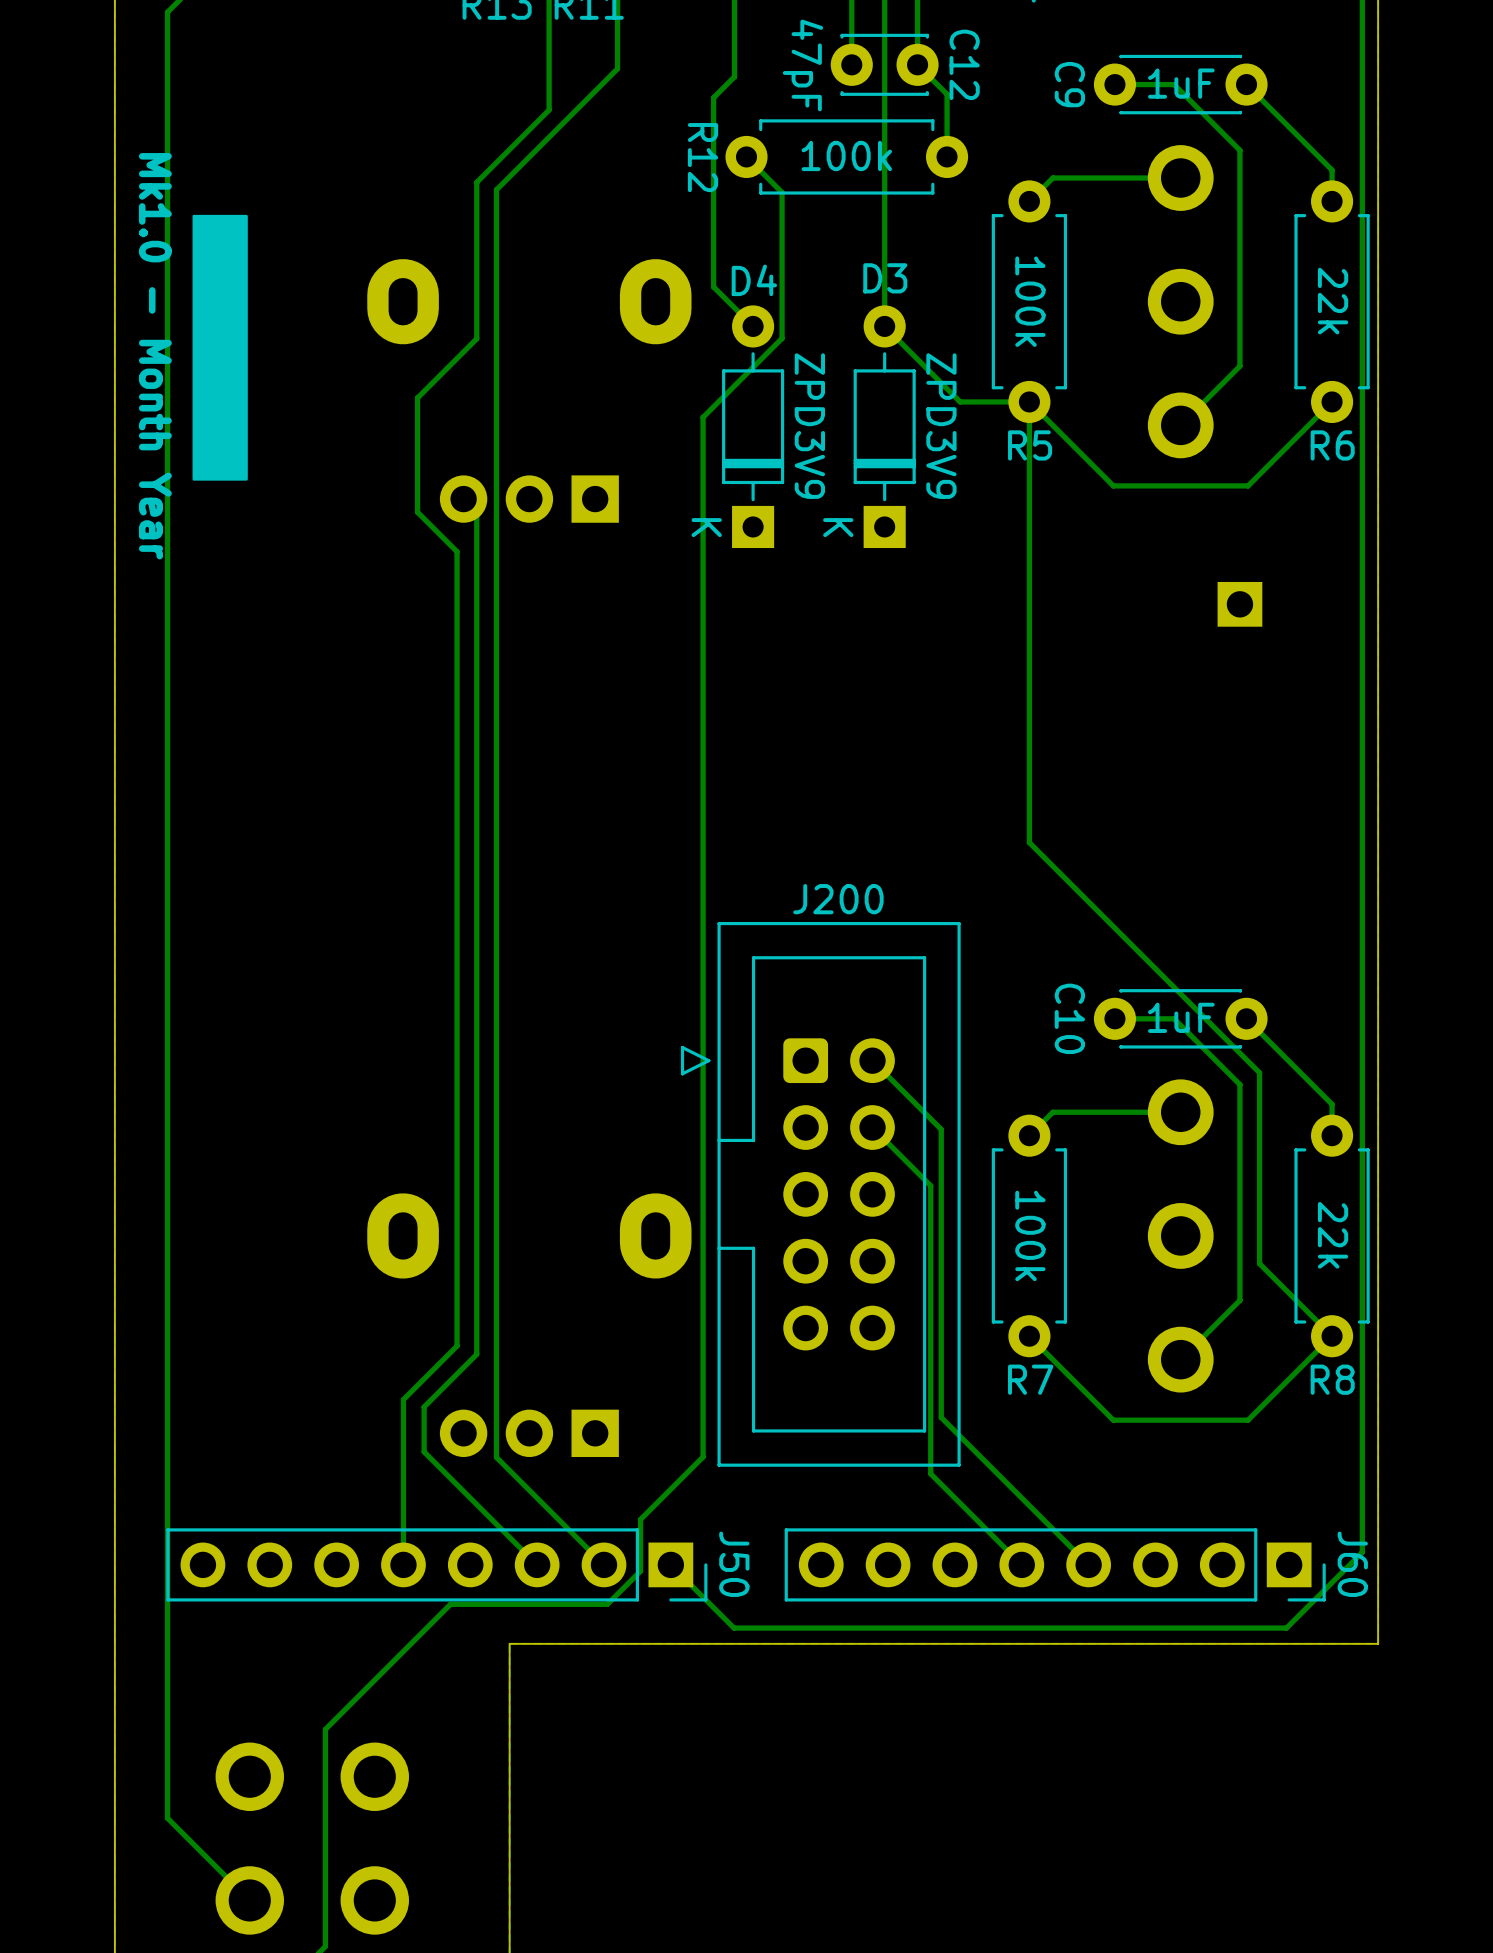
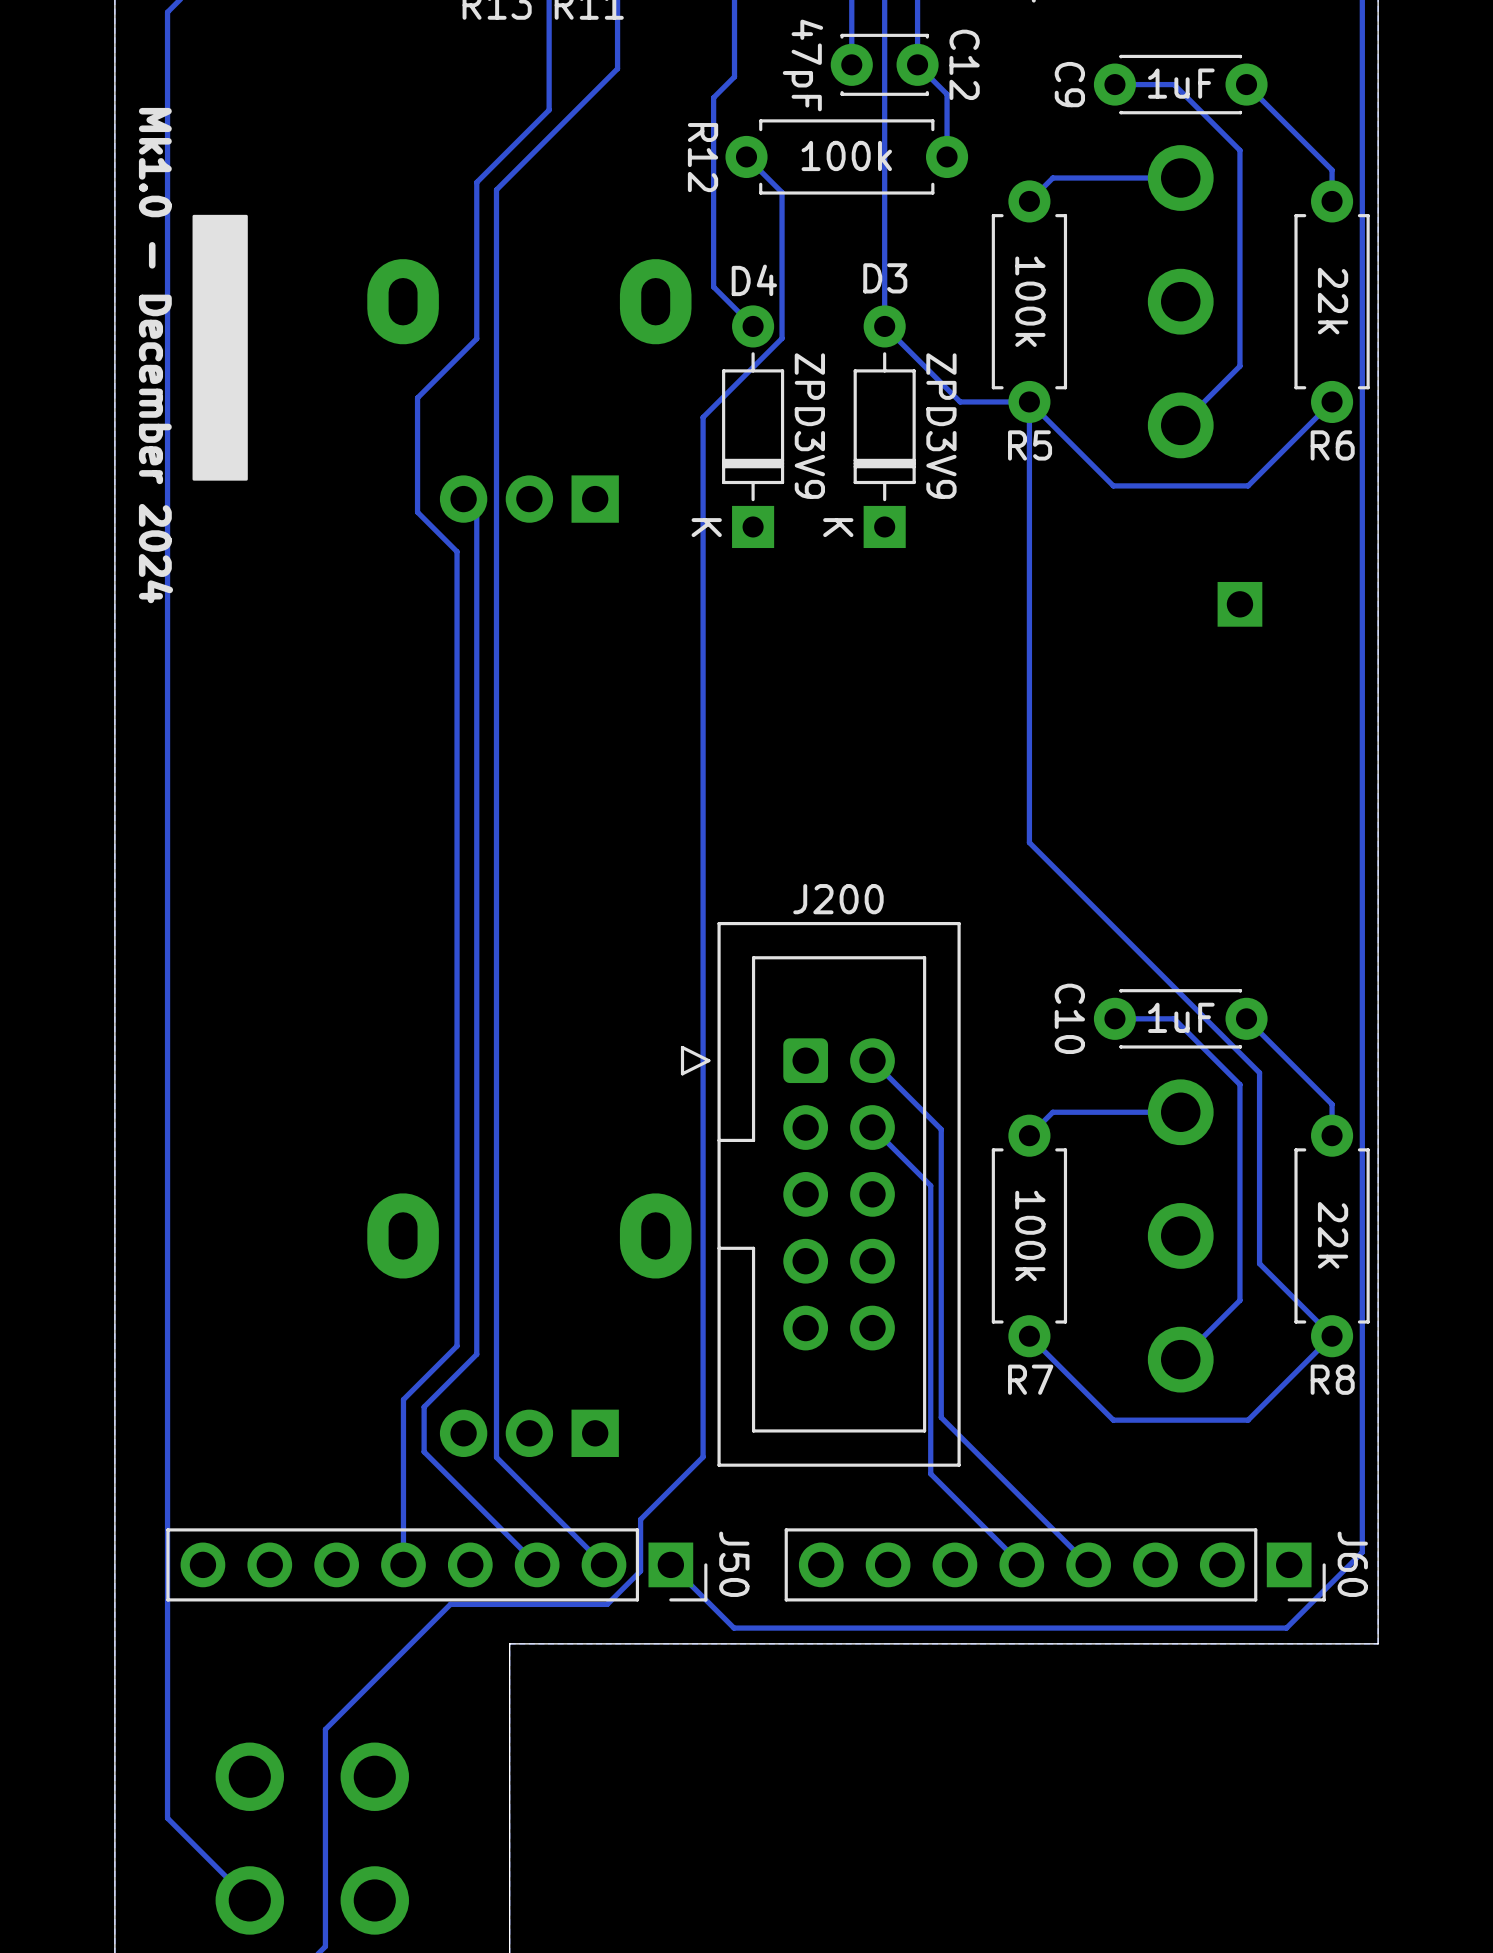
text: Mk1.0 - Month Year (155, 356) -> Mk1.0 - December 2024 (155, 355)

